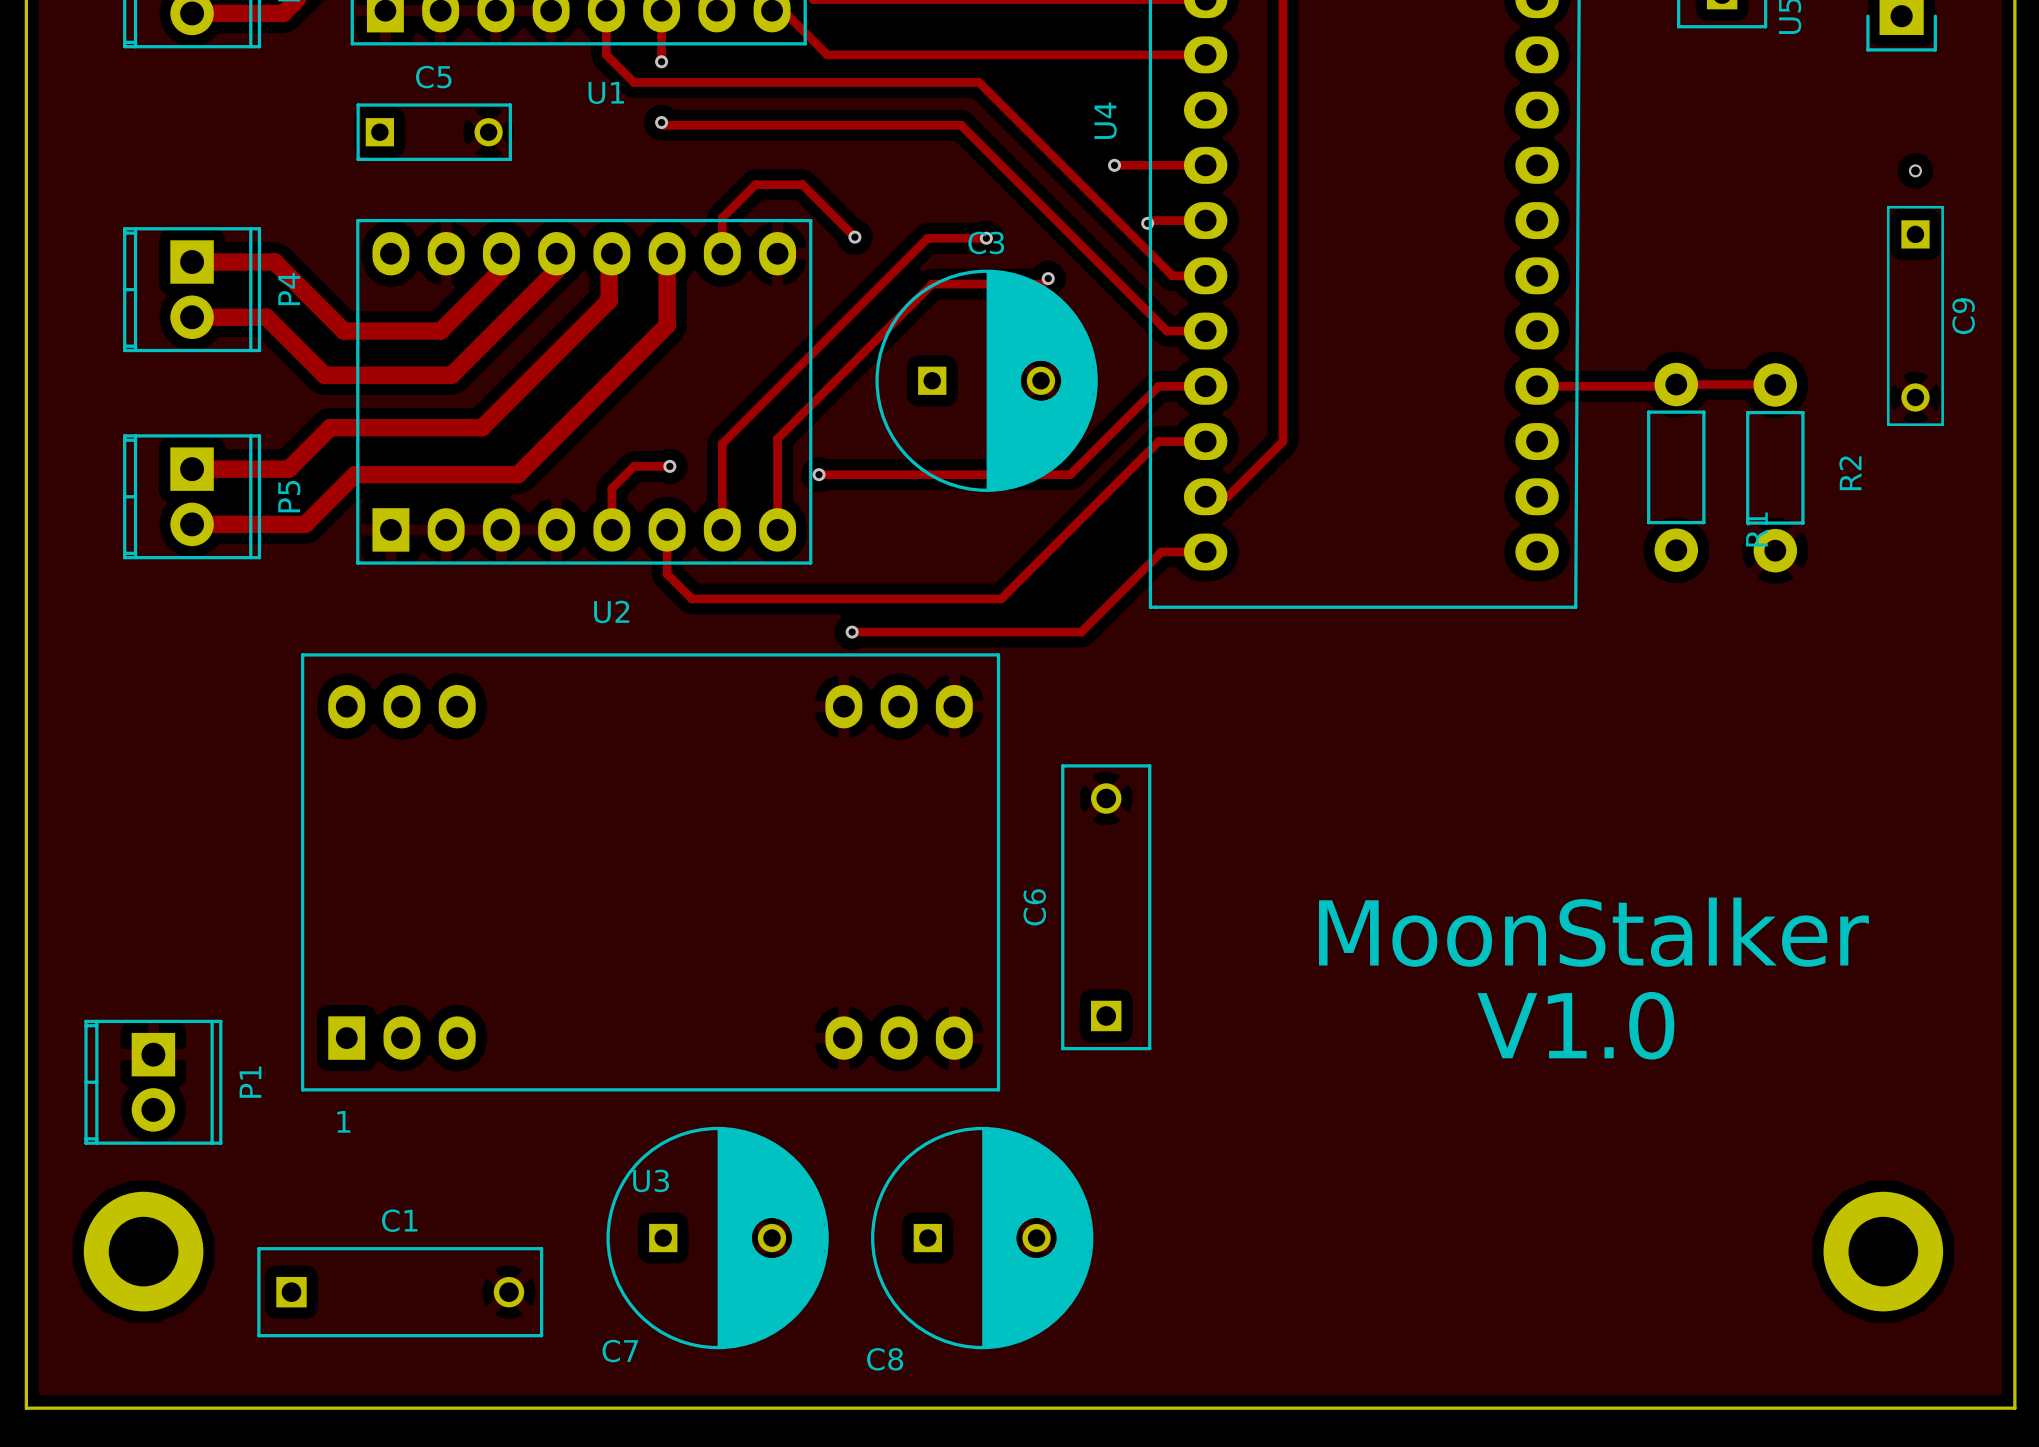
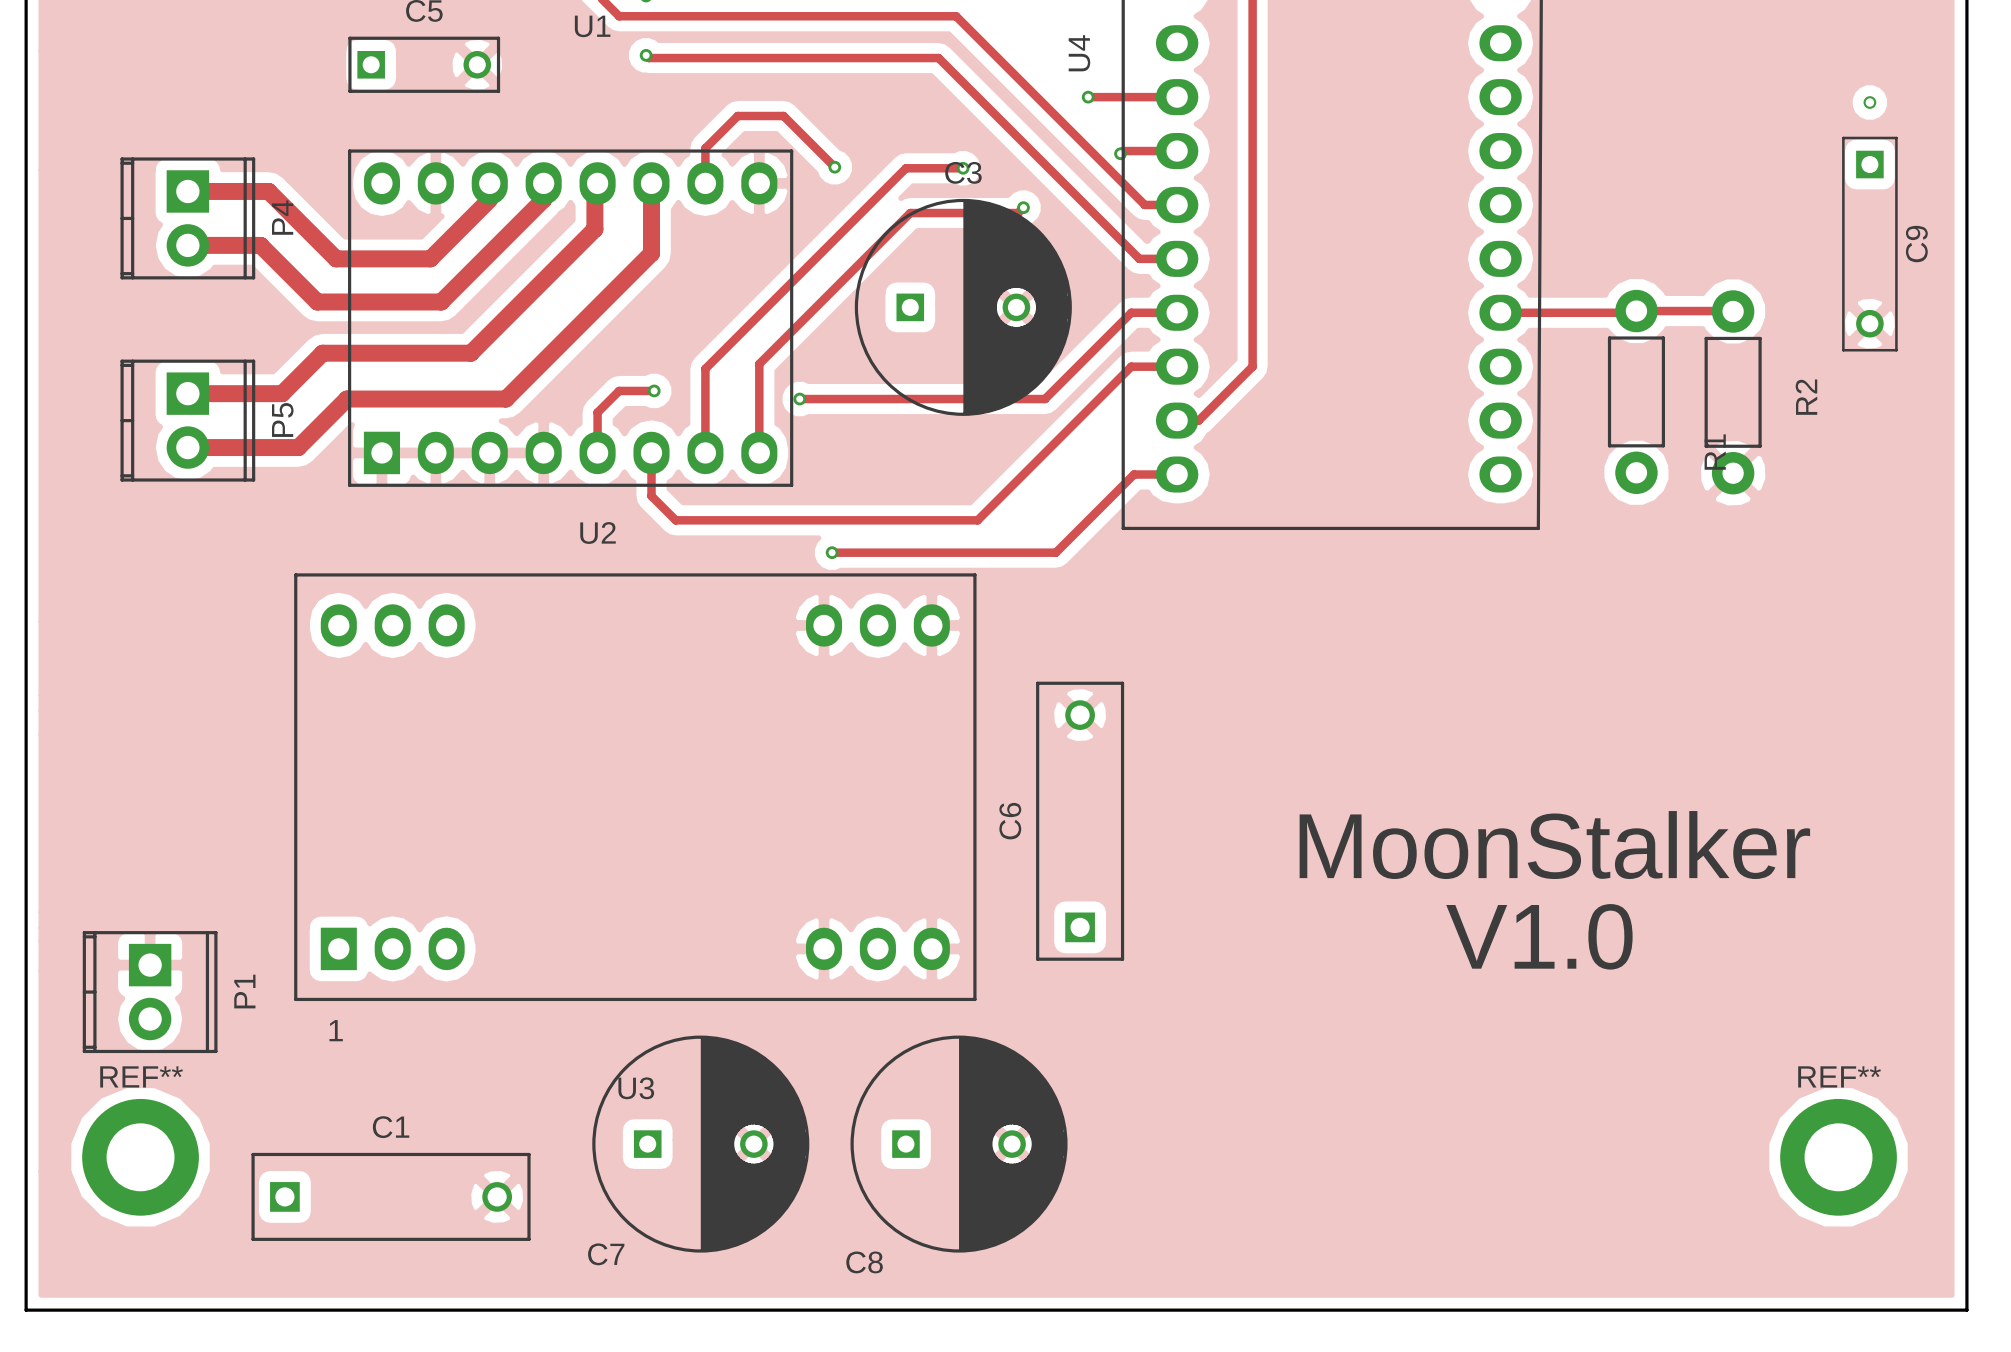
REF** name: none -> REF** (141, 1076)
REF** name: none -> REF** (1839, 1076)

